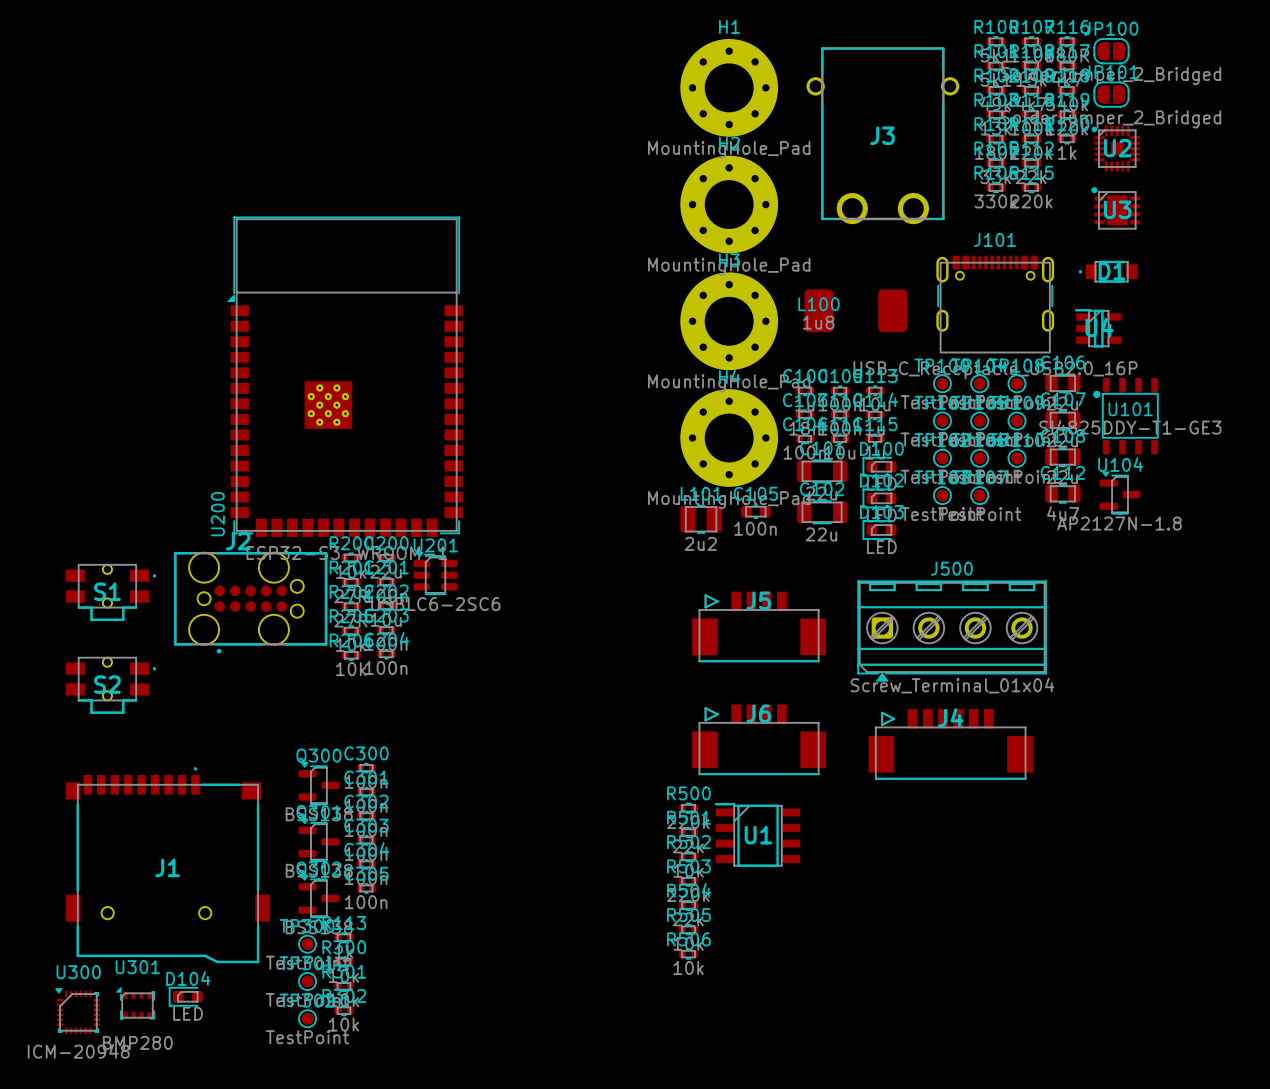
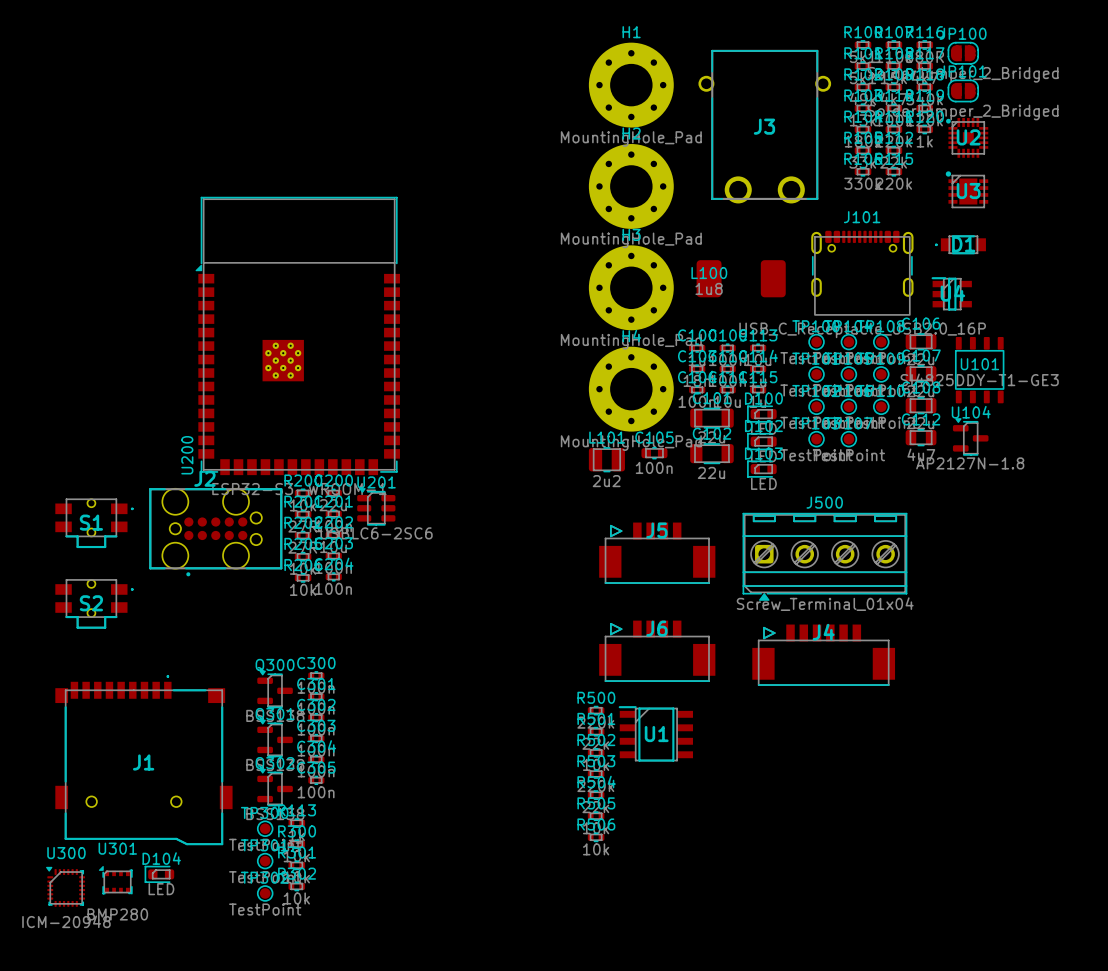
U101 footprint: [1093, 377, 1159, 455] -> [955, 337, 1005, 404]

